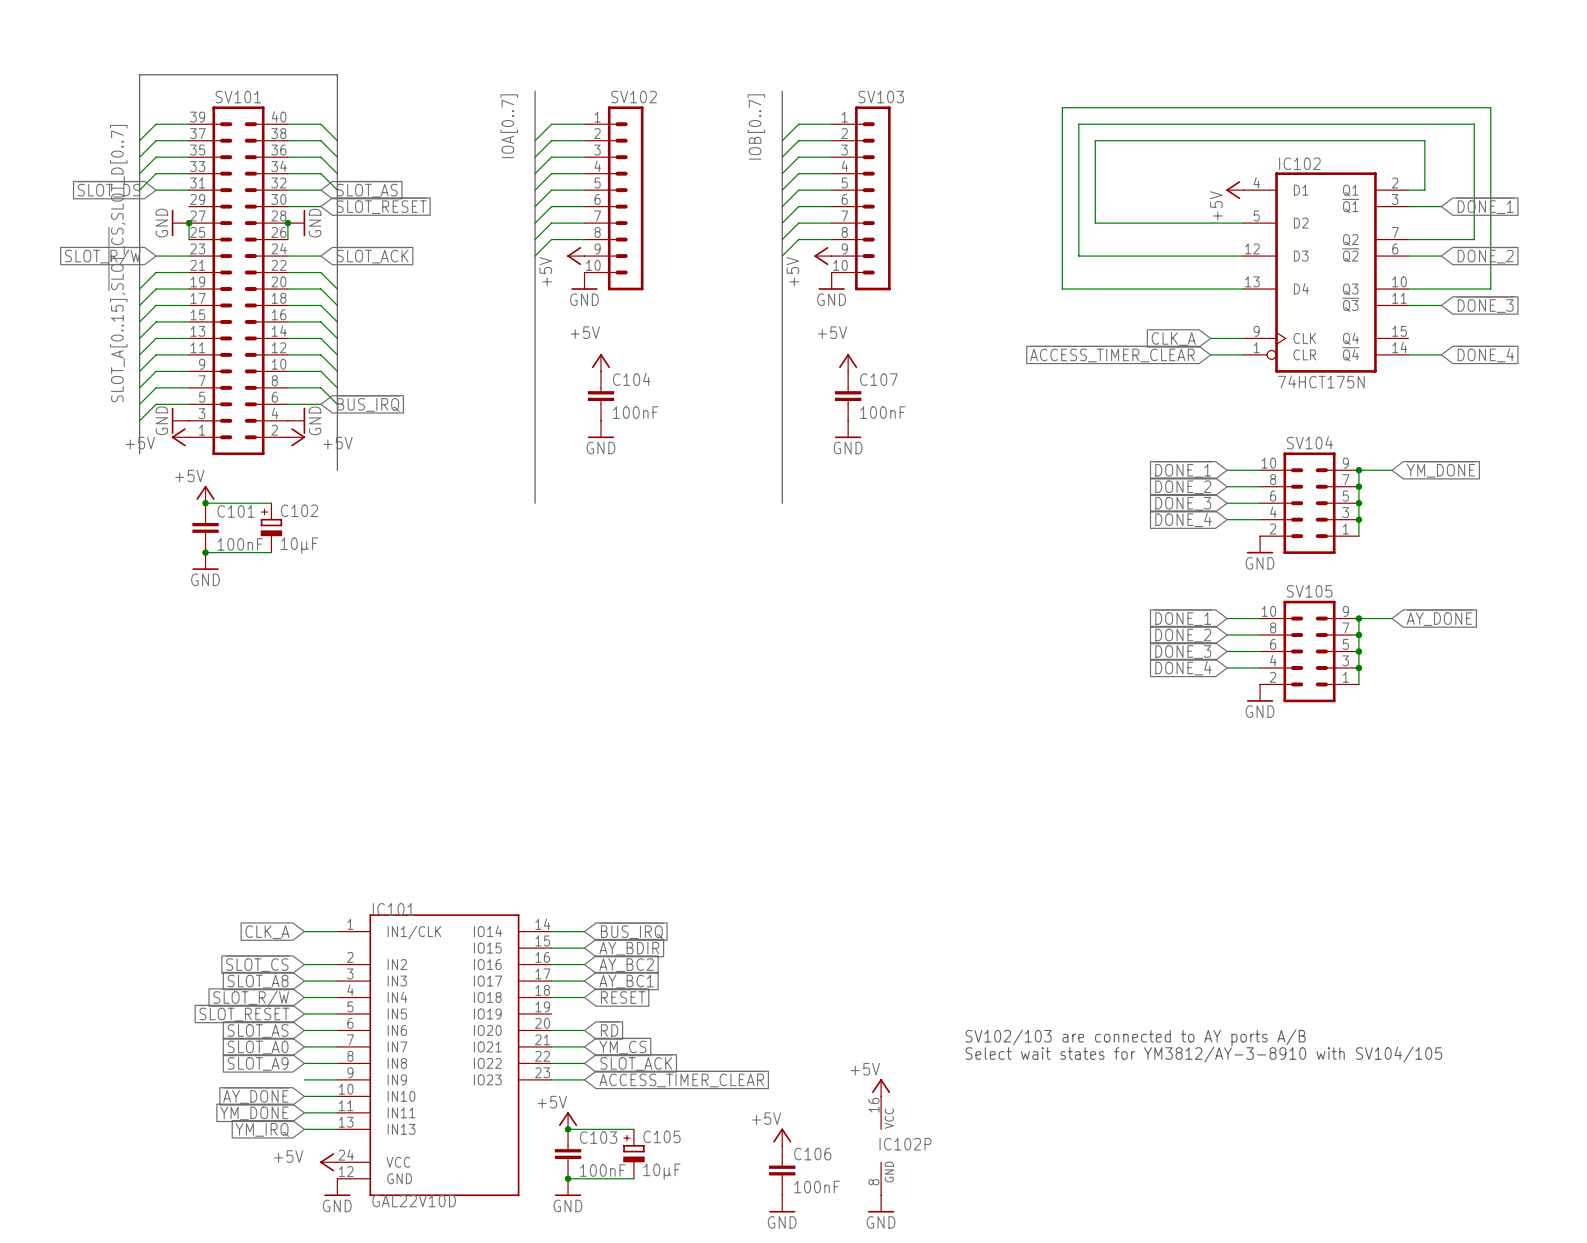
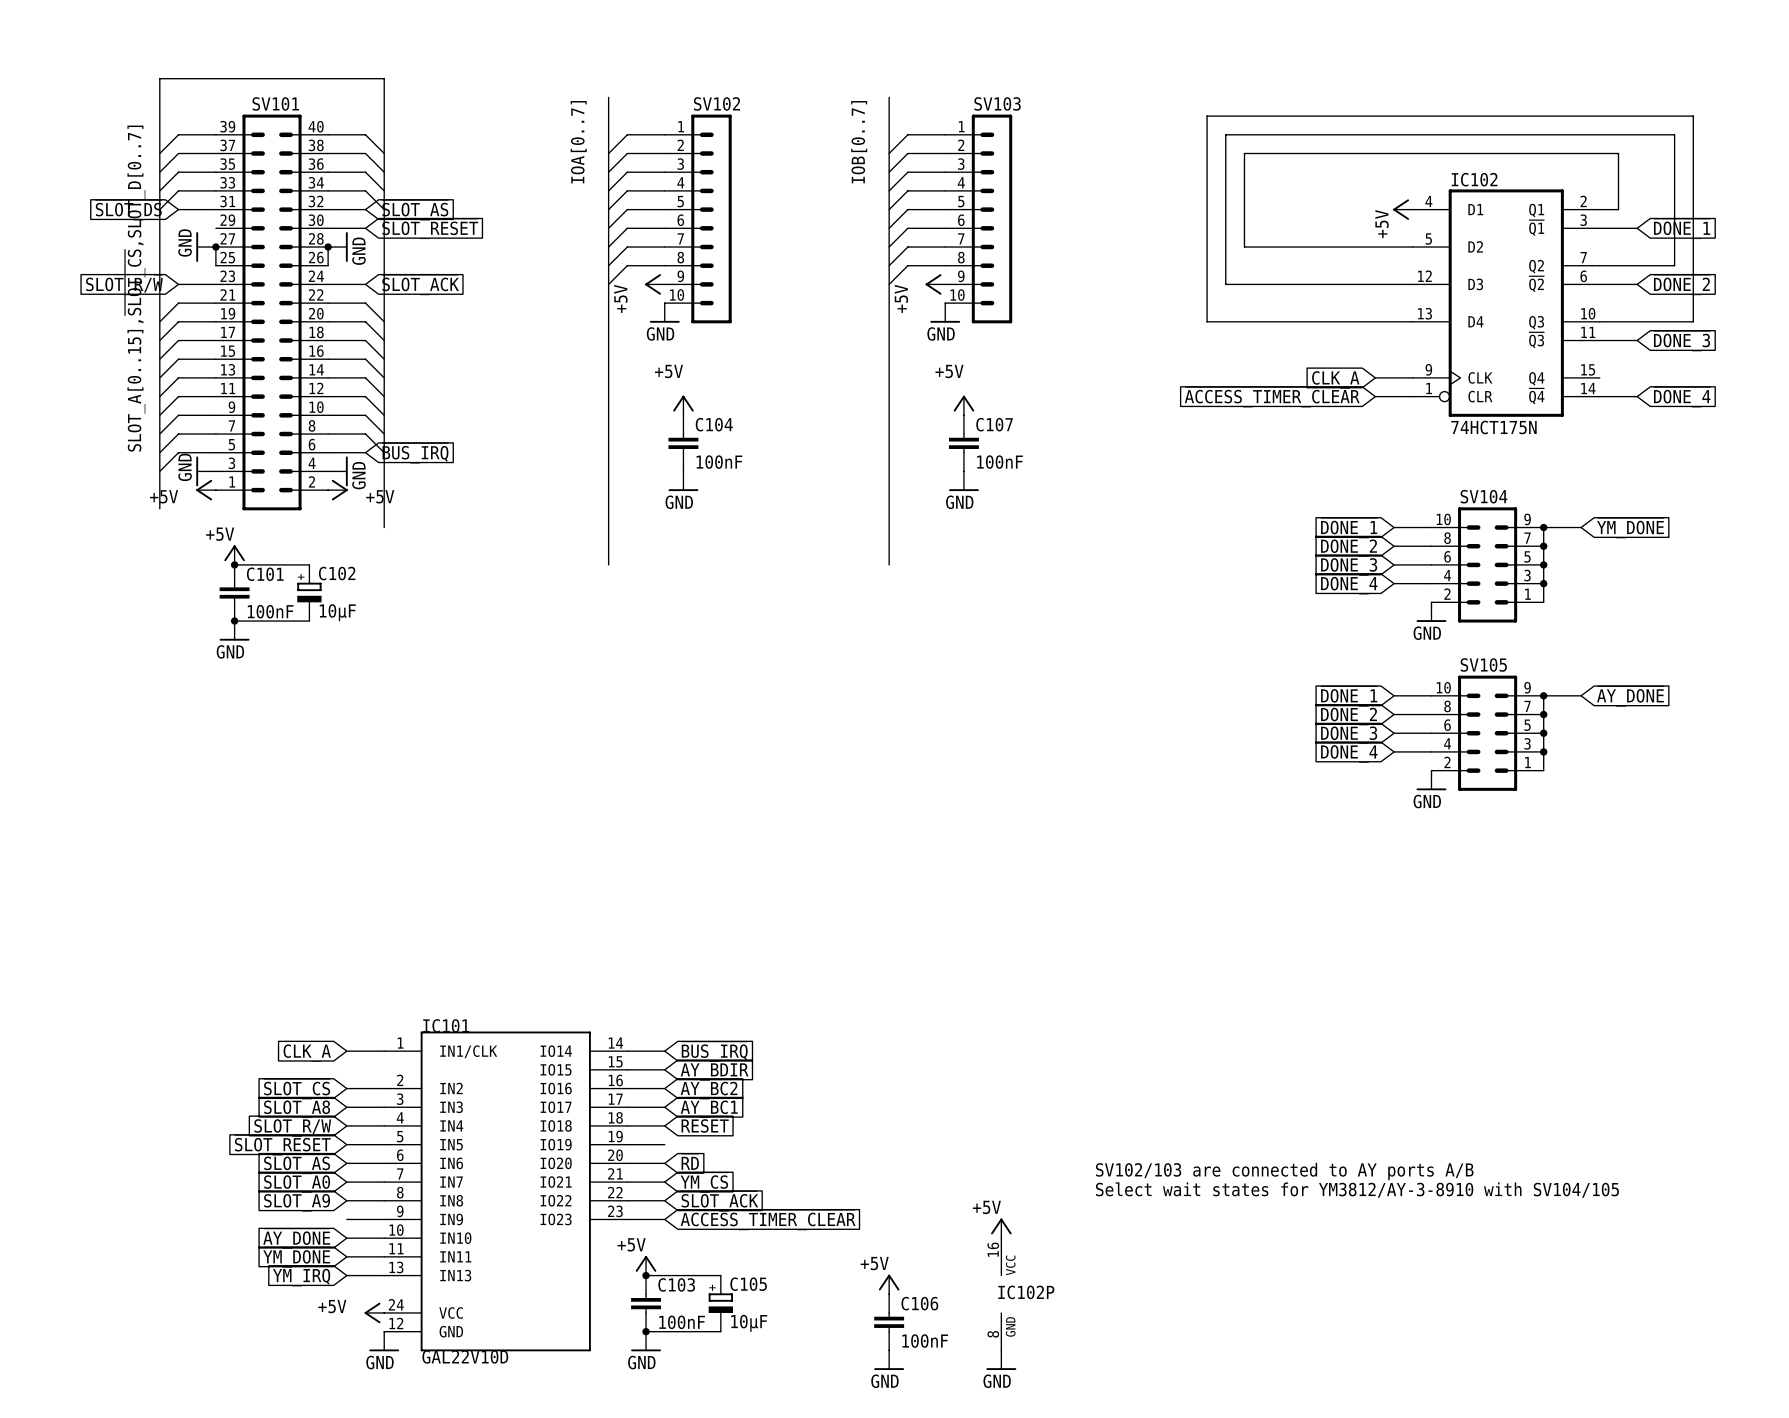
wire: none -> (627, 1144) (664, 1144)

